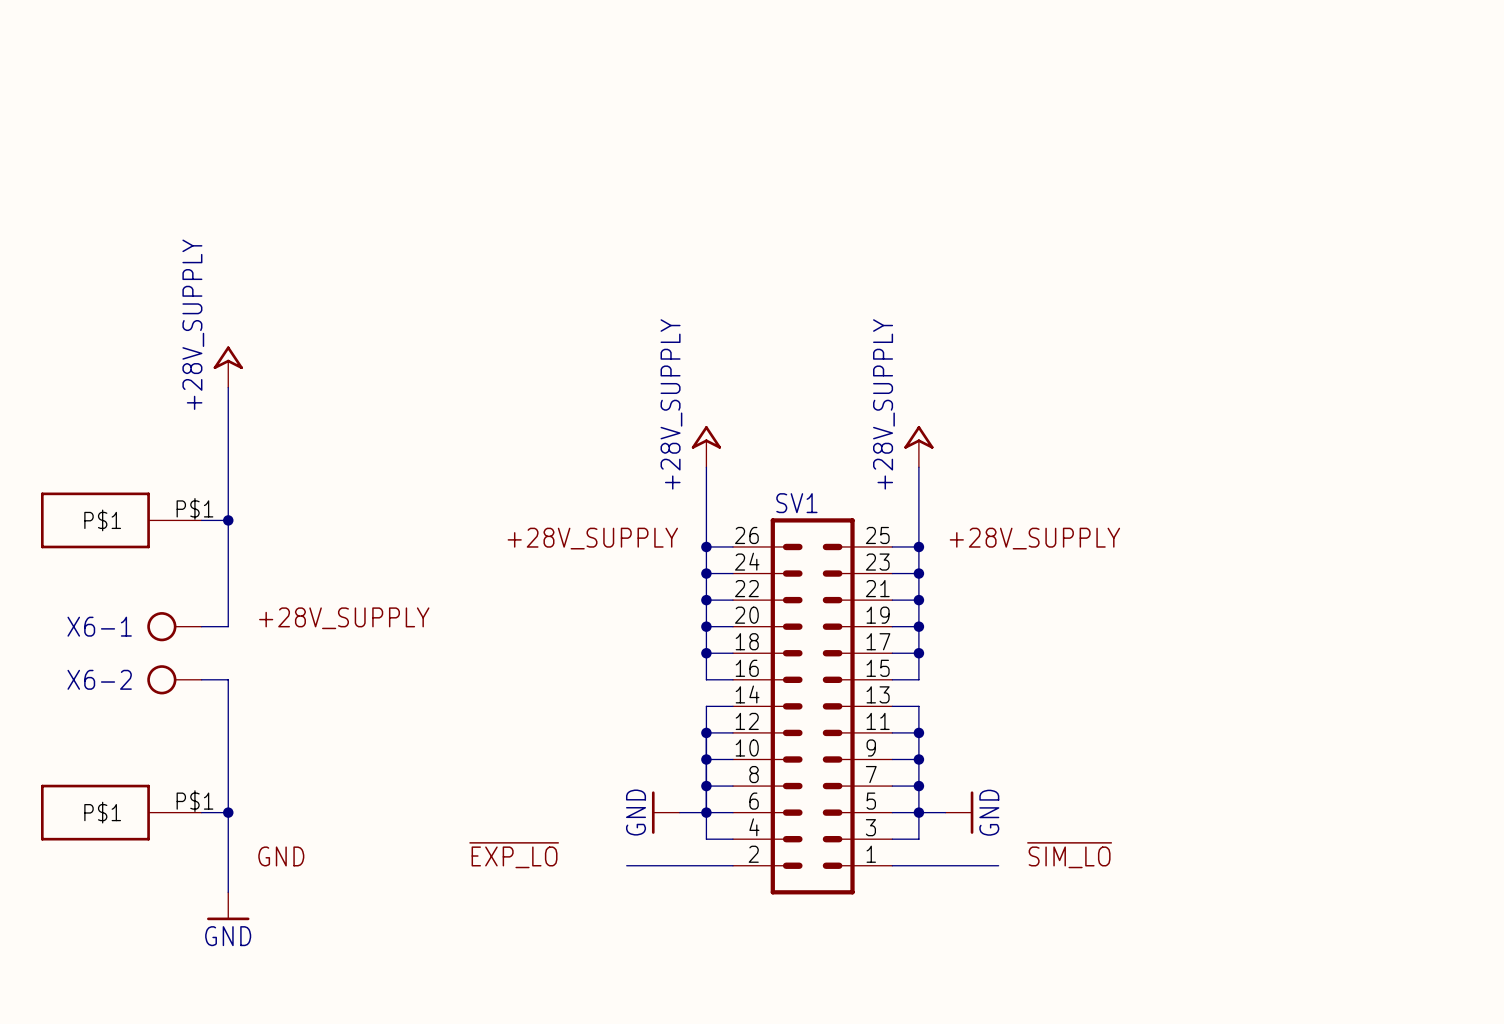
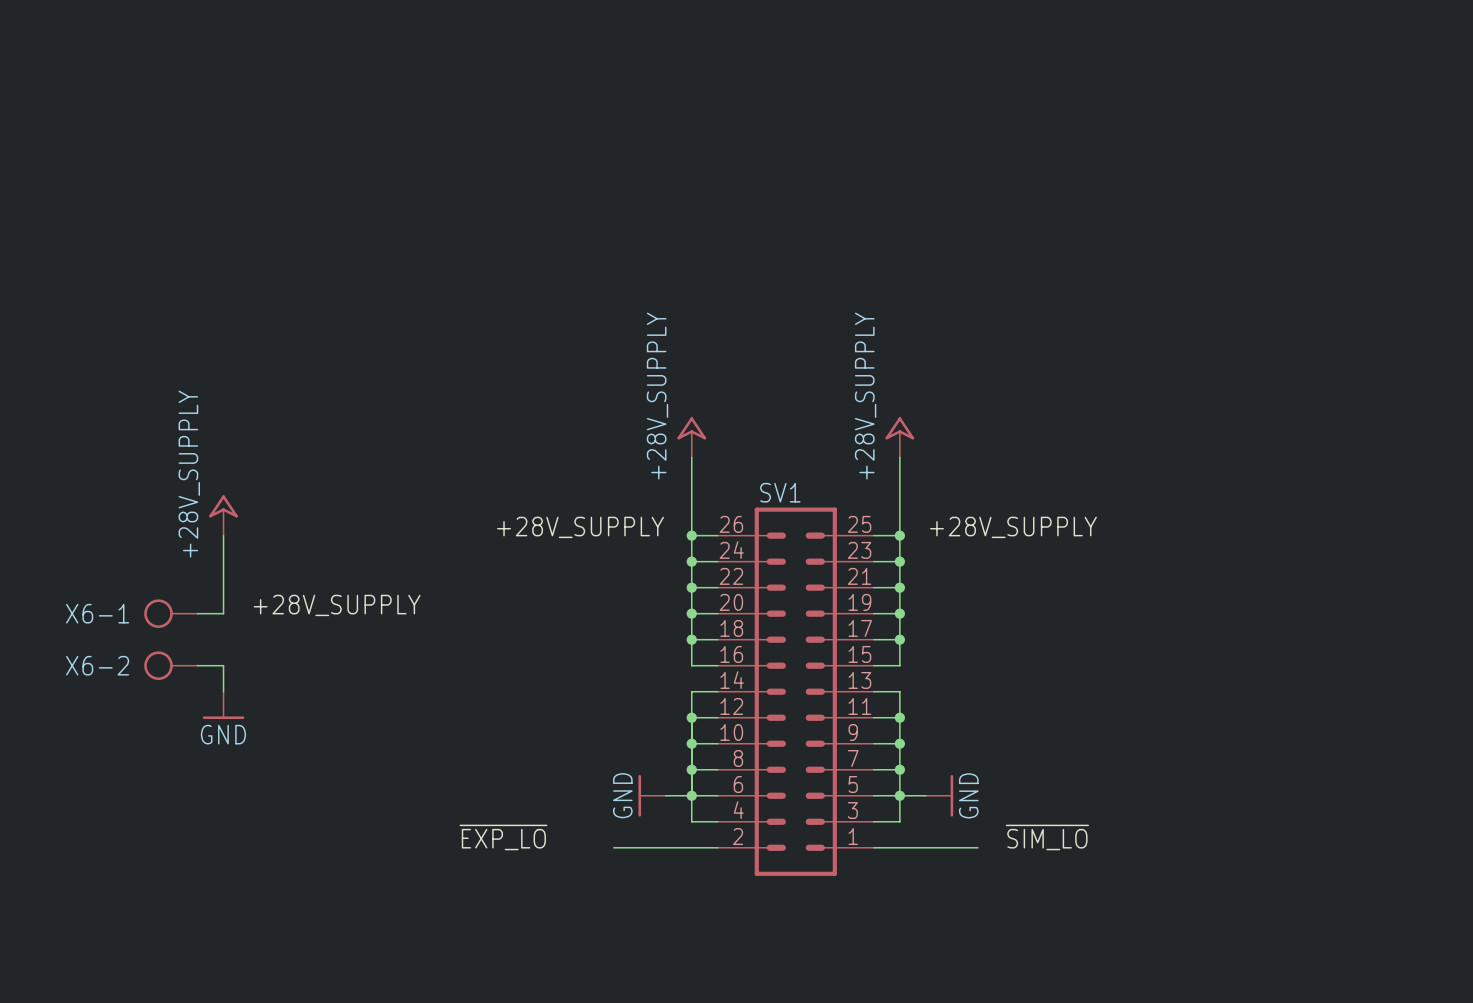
power symbol position: +28V_SUPPLY (228, 367) -> +28V_SUPPLY (223, 515)
wire: (228, 387) (228, 546) -> none
part: (121, 520) -> none
wire: (201, 520) (228, 520) -> none
junction: (228, 520) -> none
wire: (228, 706) (228, 892) -> none
part: (121, 812) -> none
wire: (201, 812) (228, 812) -> none
junction: (228, 812) -> none
label: GND (281, 856) -> none
power symbol position: GND (228, 906) -> GND (223, 705)

